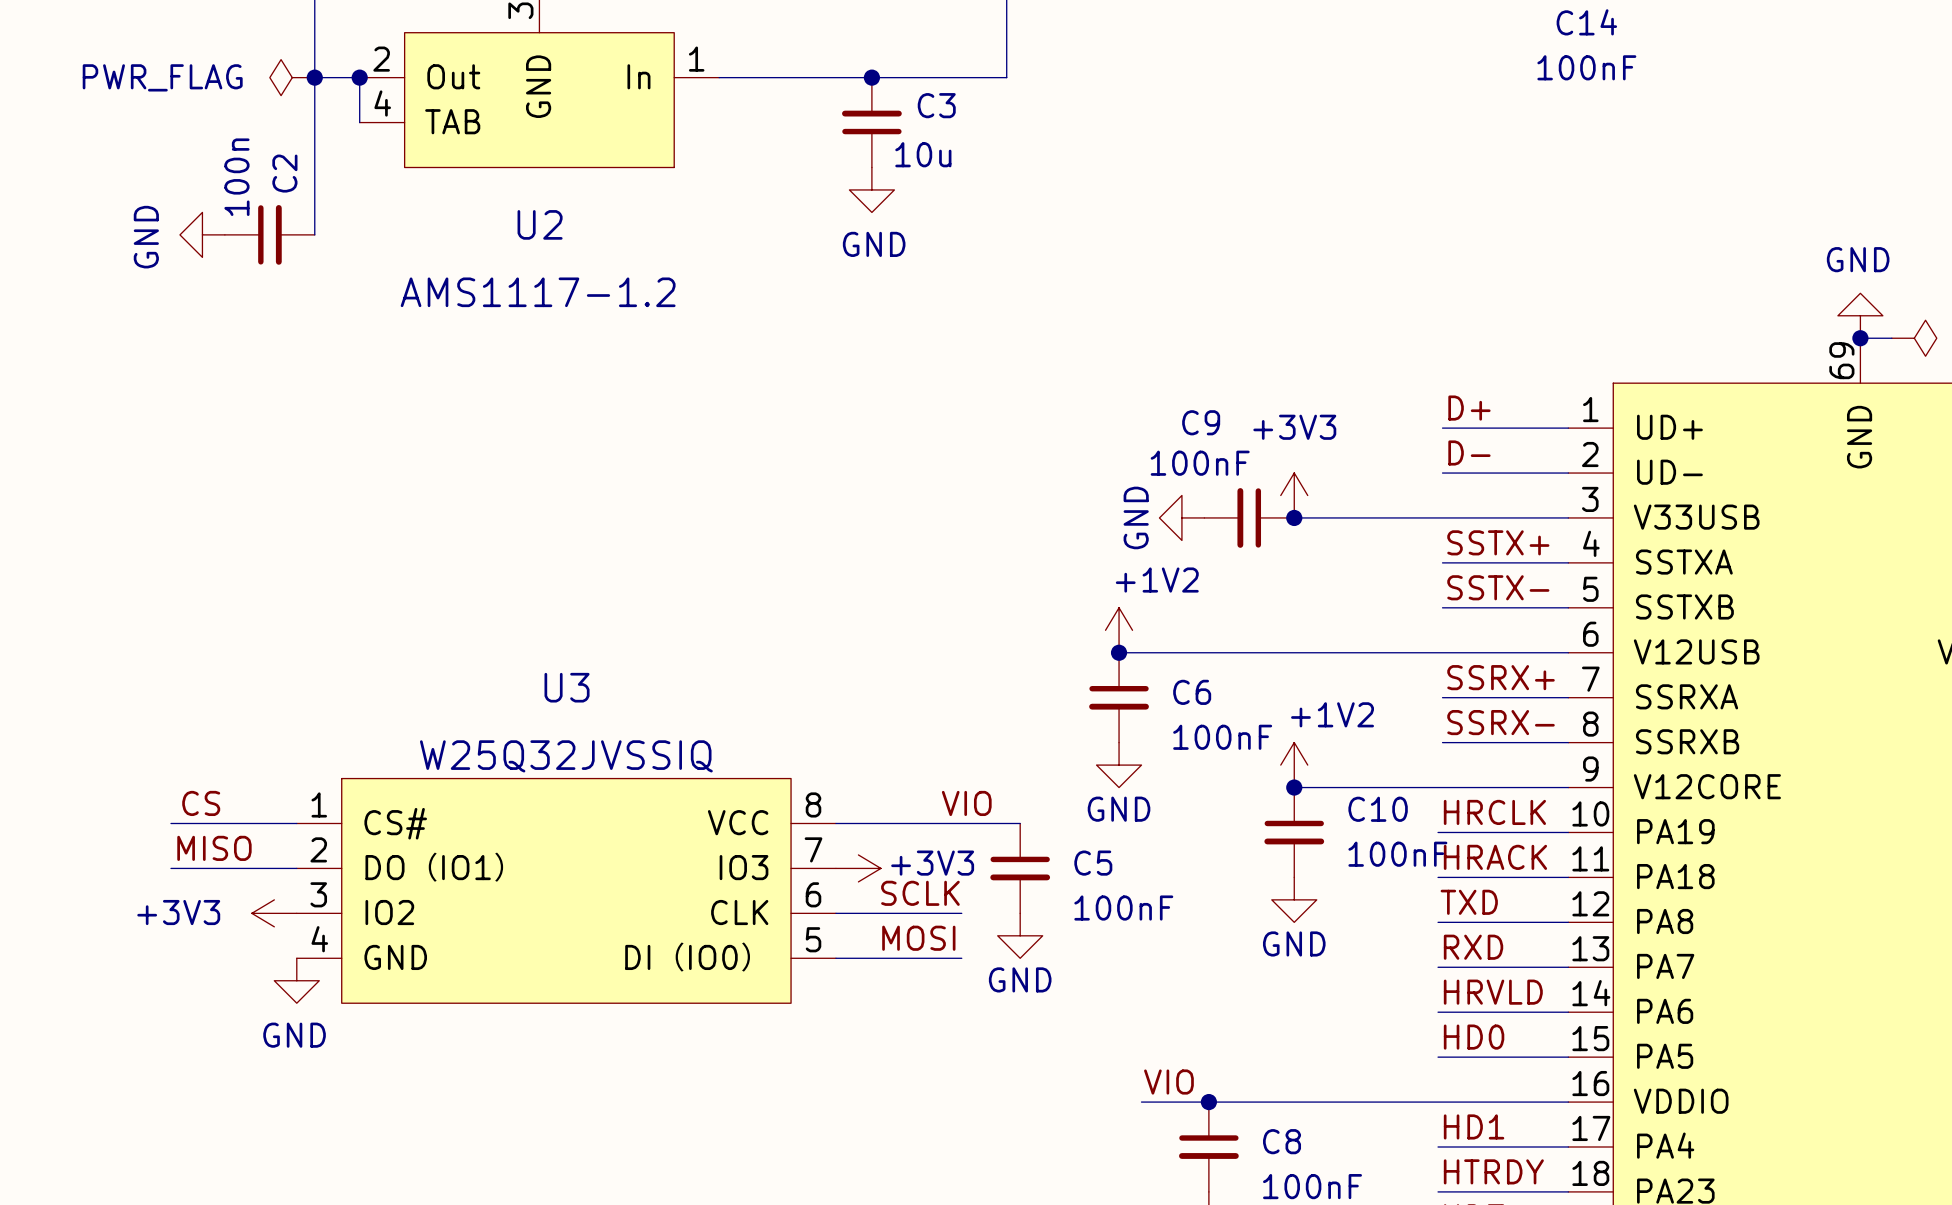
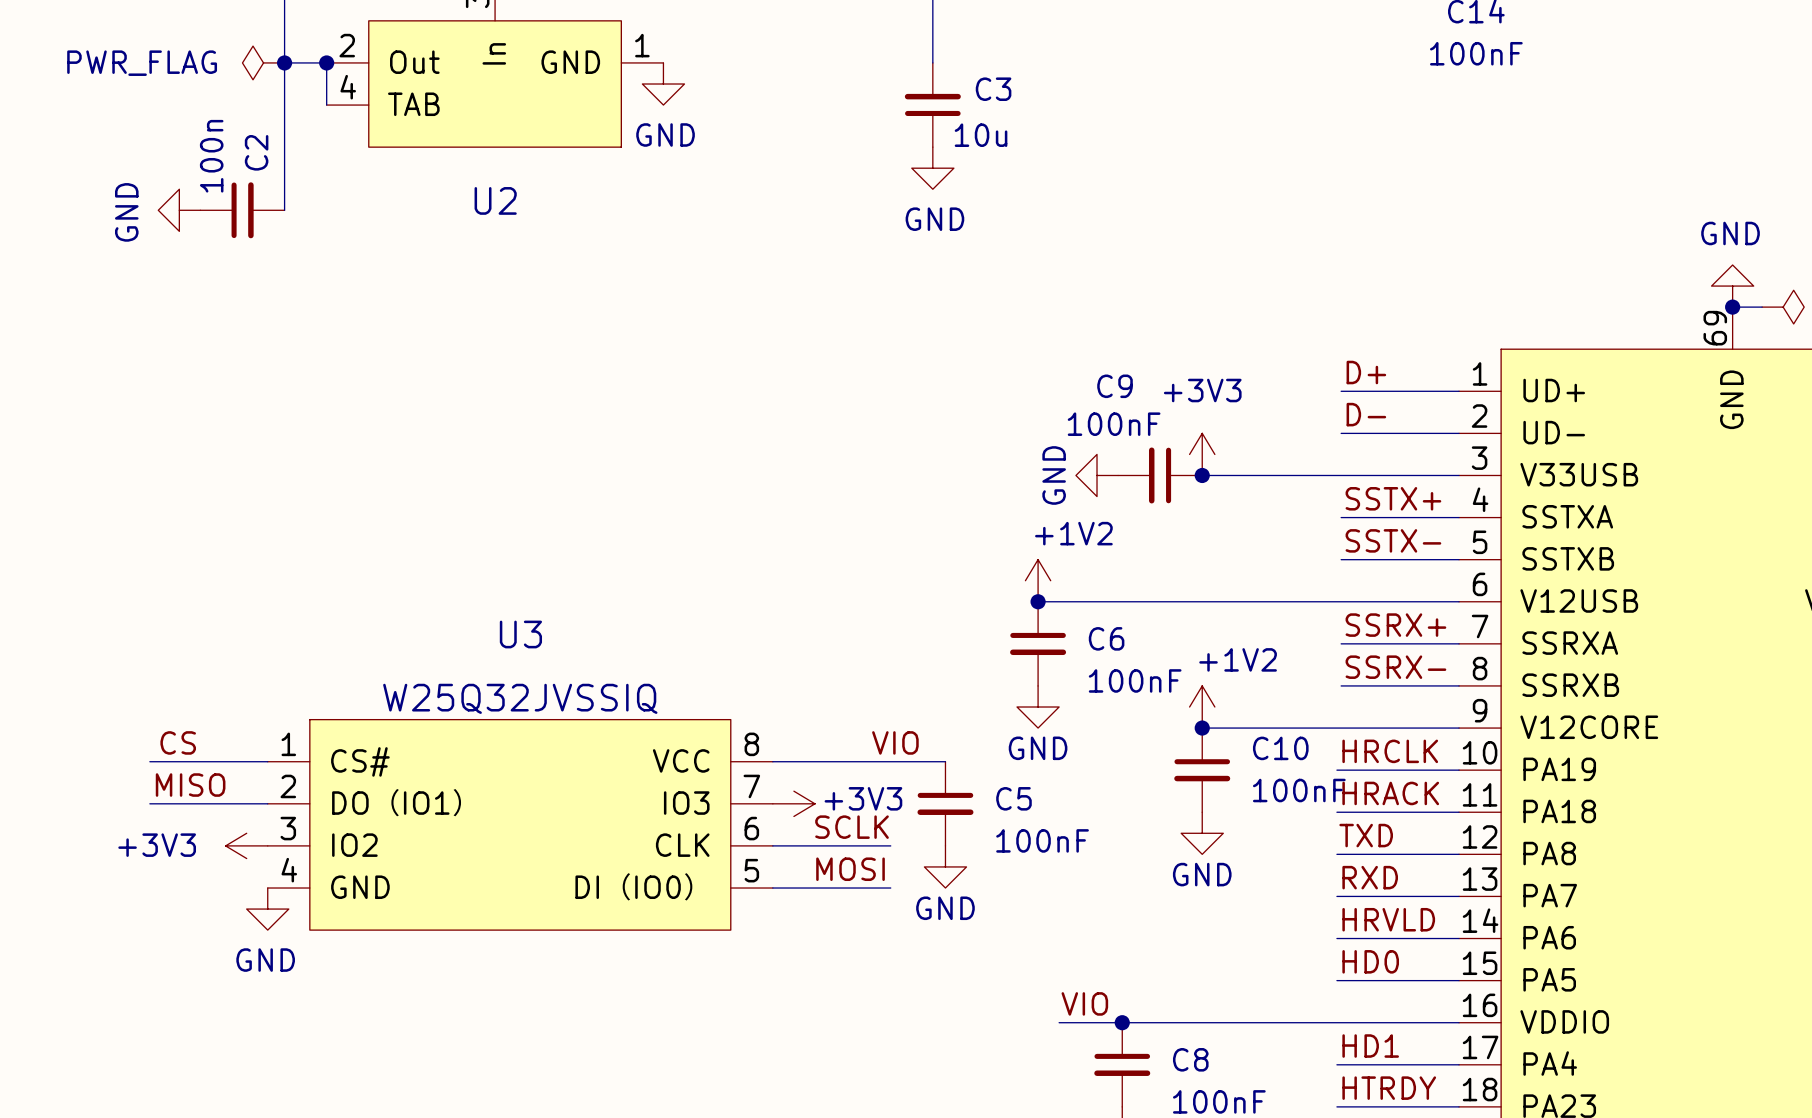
U2 pin name: In (638, 76) -> GND (570, 62)
wire: (719, 77) (1006, 77) -> none
junction: (871, 77) -> none
U2 pin name: GND (538, 86) -> In (494, 53)
power symbol: none -> GND (663, 84)
C3 position: (871, 122) -> (932, 105)
power symbol: GND (871, 189) -> none
power symbol: none -> GND (932, 168)
U2 value: AMS1117-1.2 (538, 292) -> none

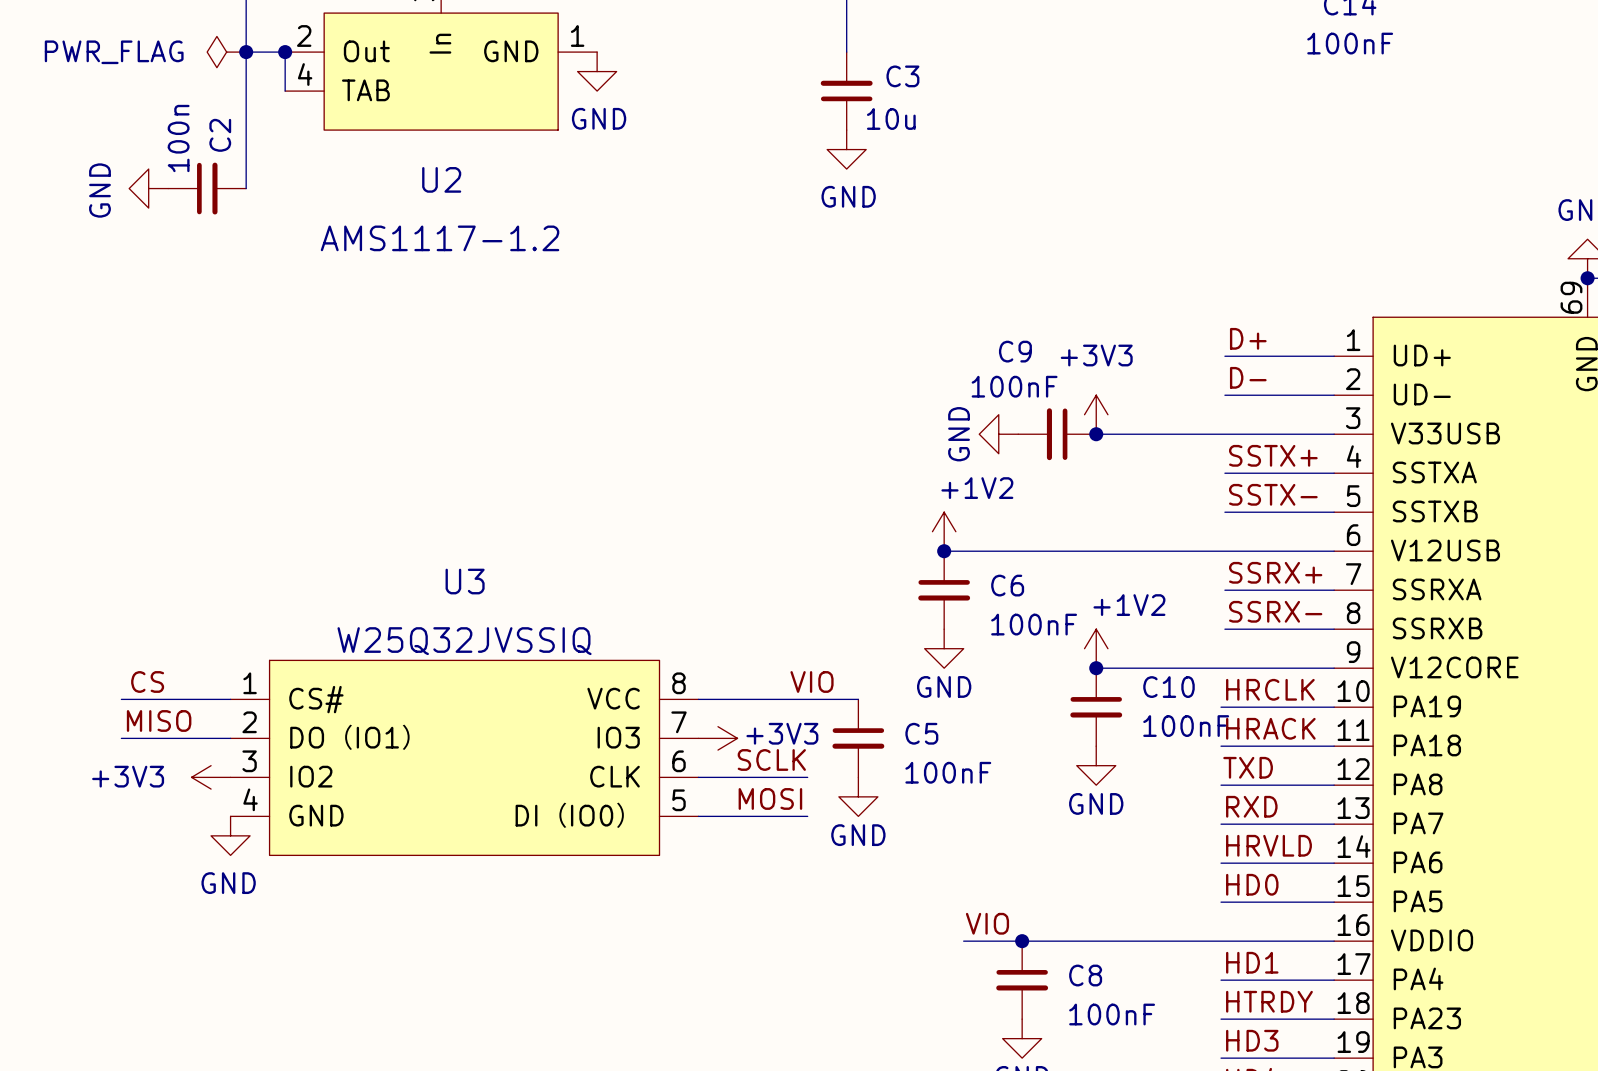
U2 value: none -> AMS1117-1.2 (440, 238)

